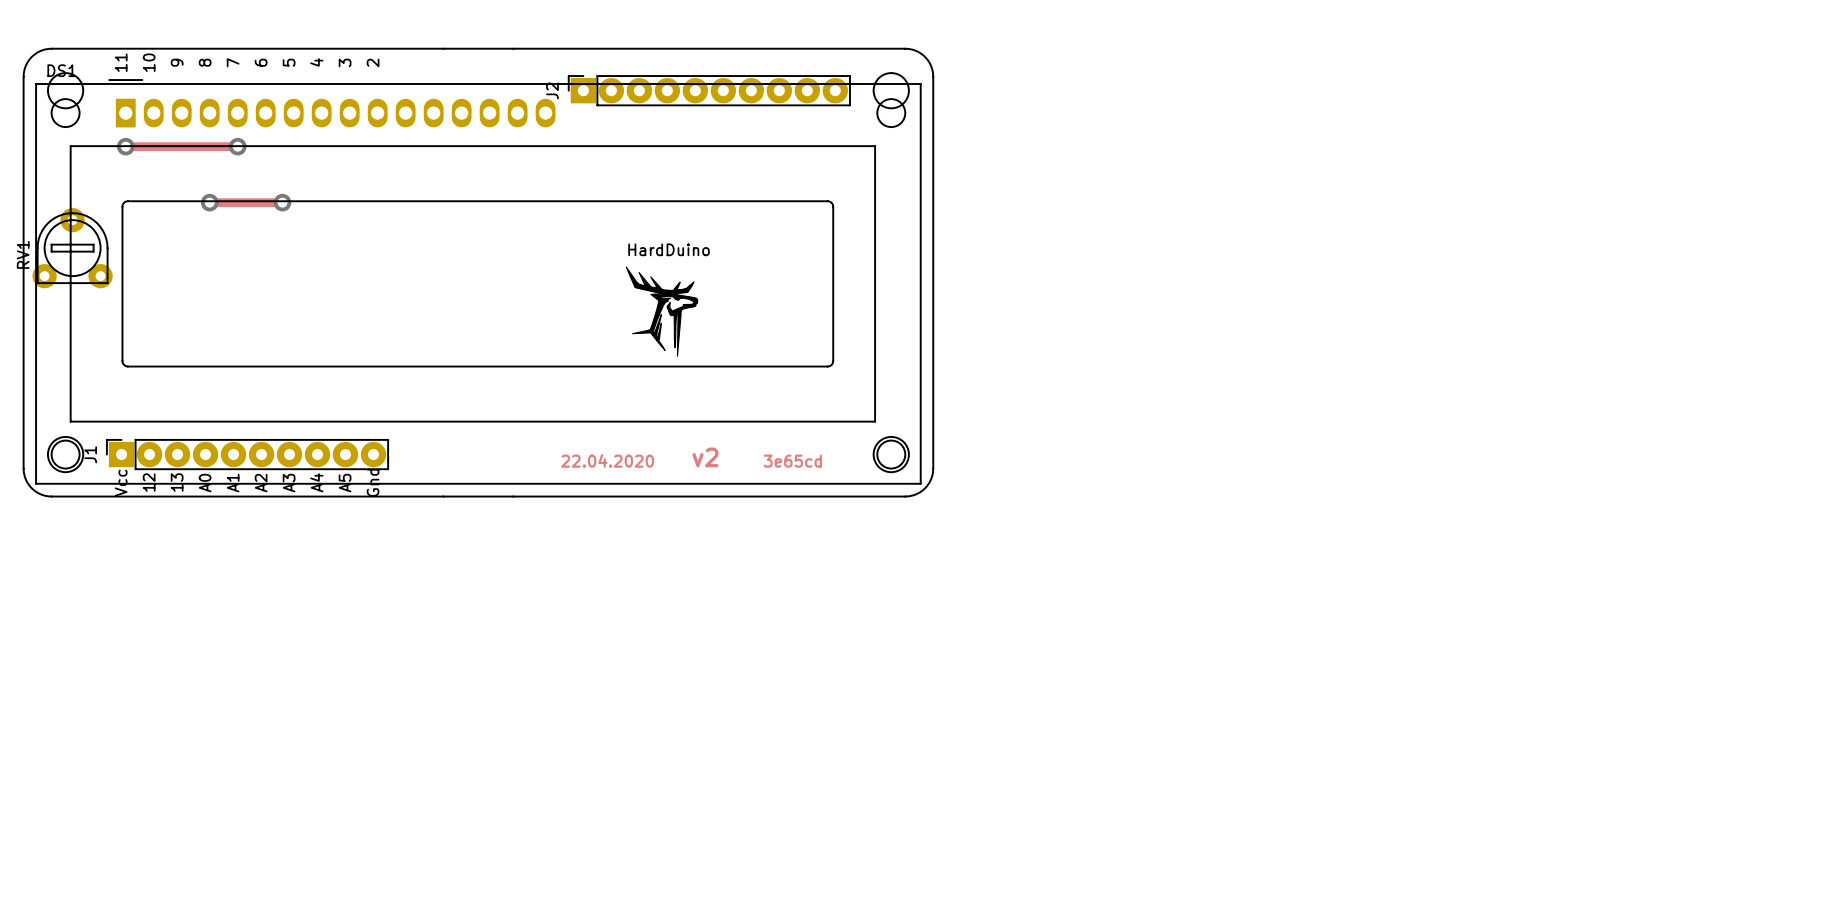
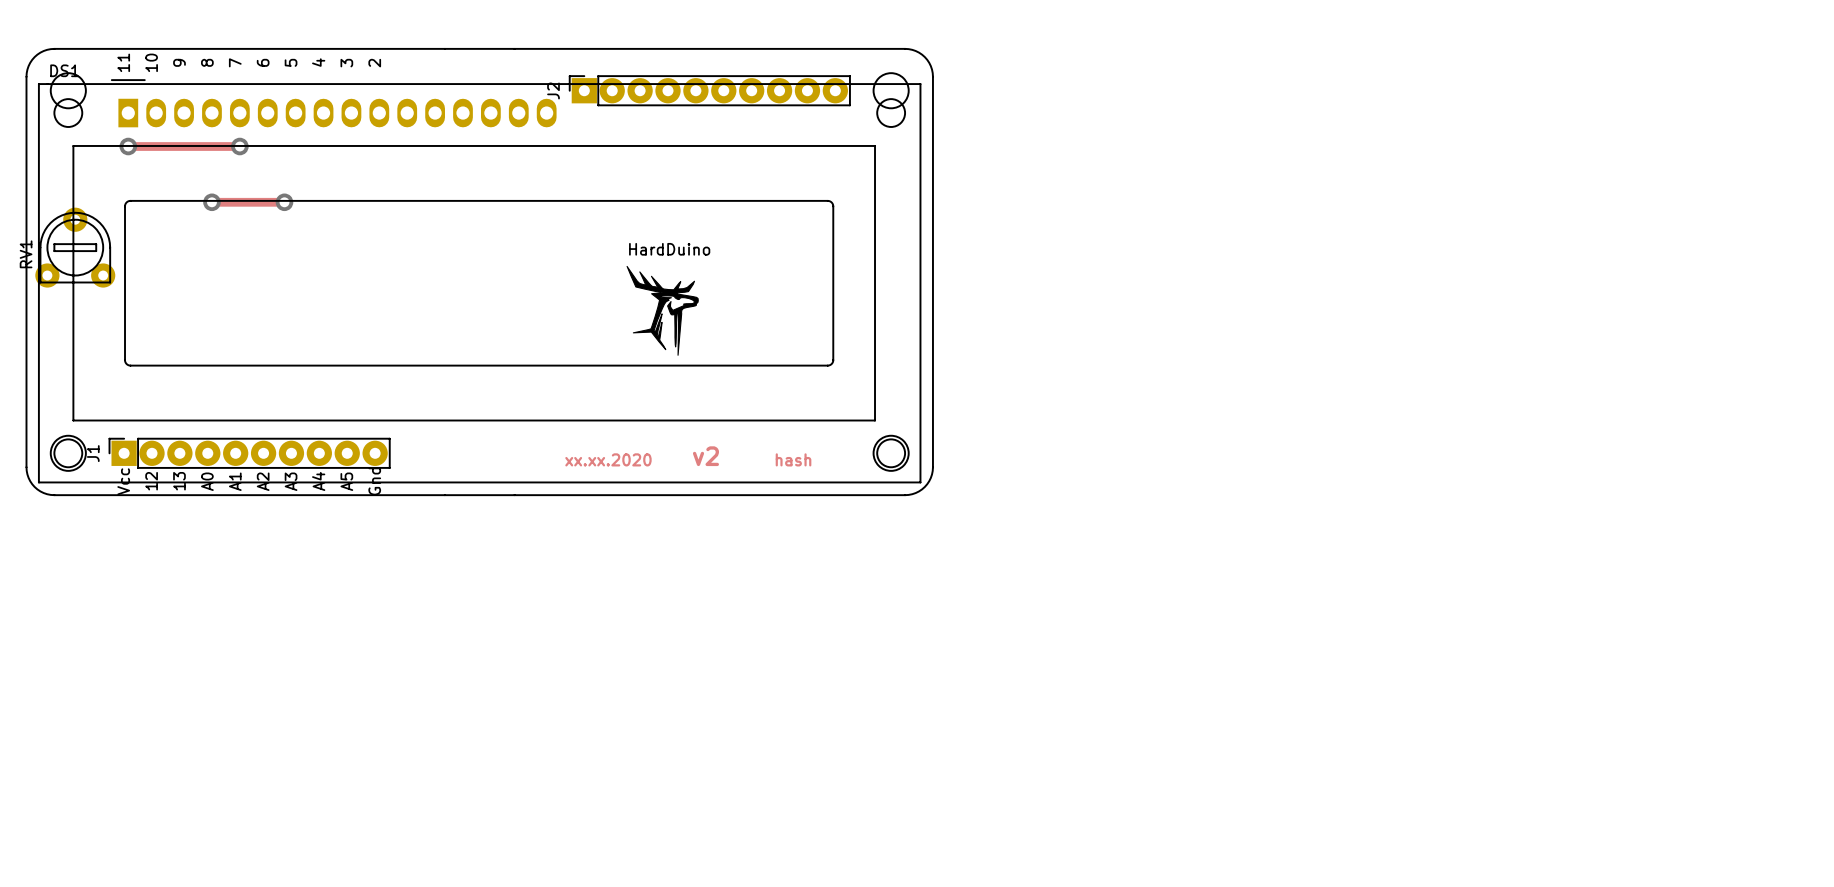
text: 22.04.2020 (607, 460) -> xx.xx.2020 (608, 459)
text: 3e65cd (792, 461) -> hash (793, 459)

